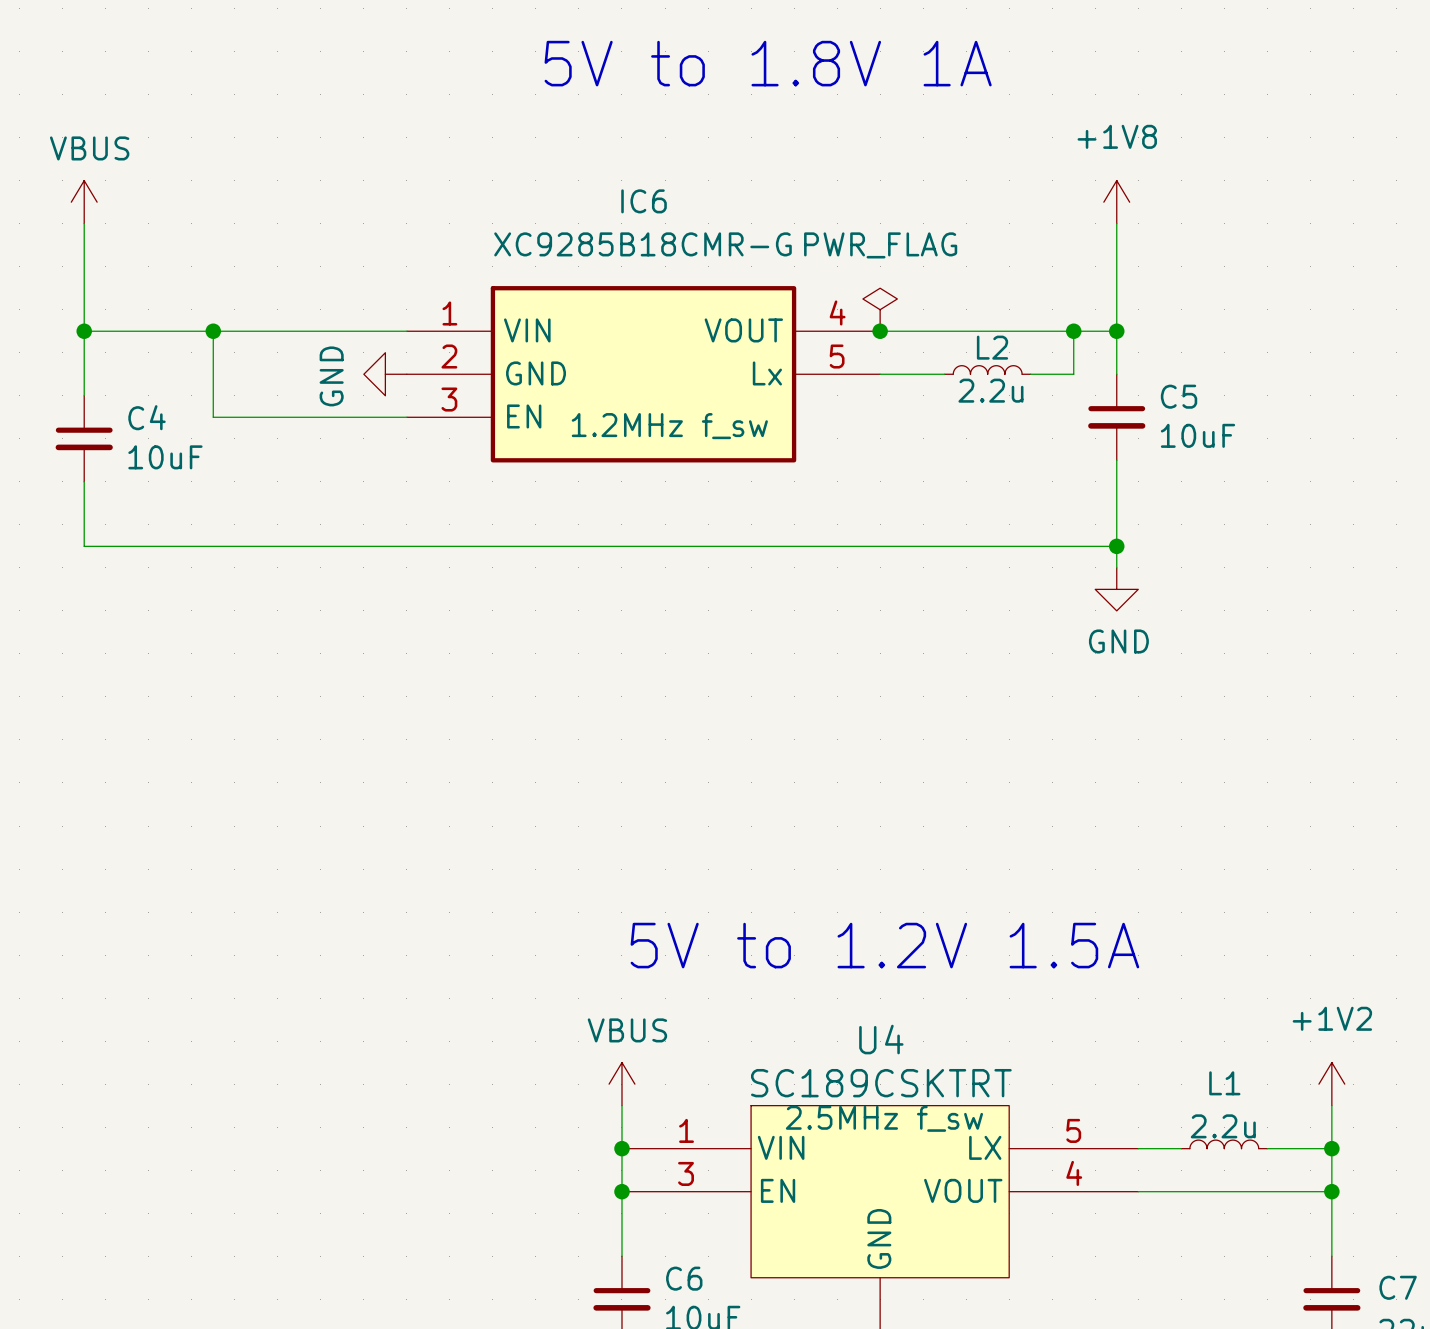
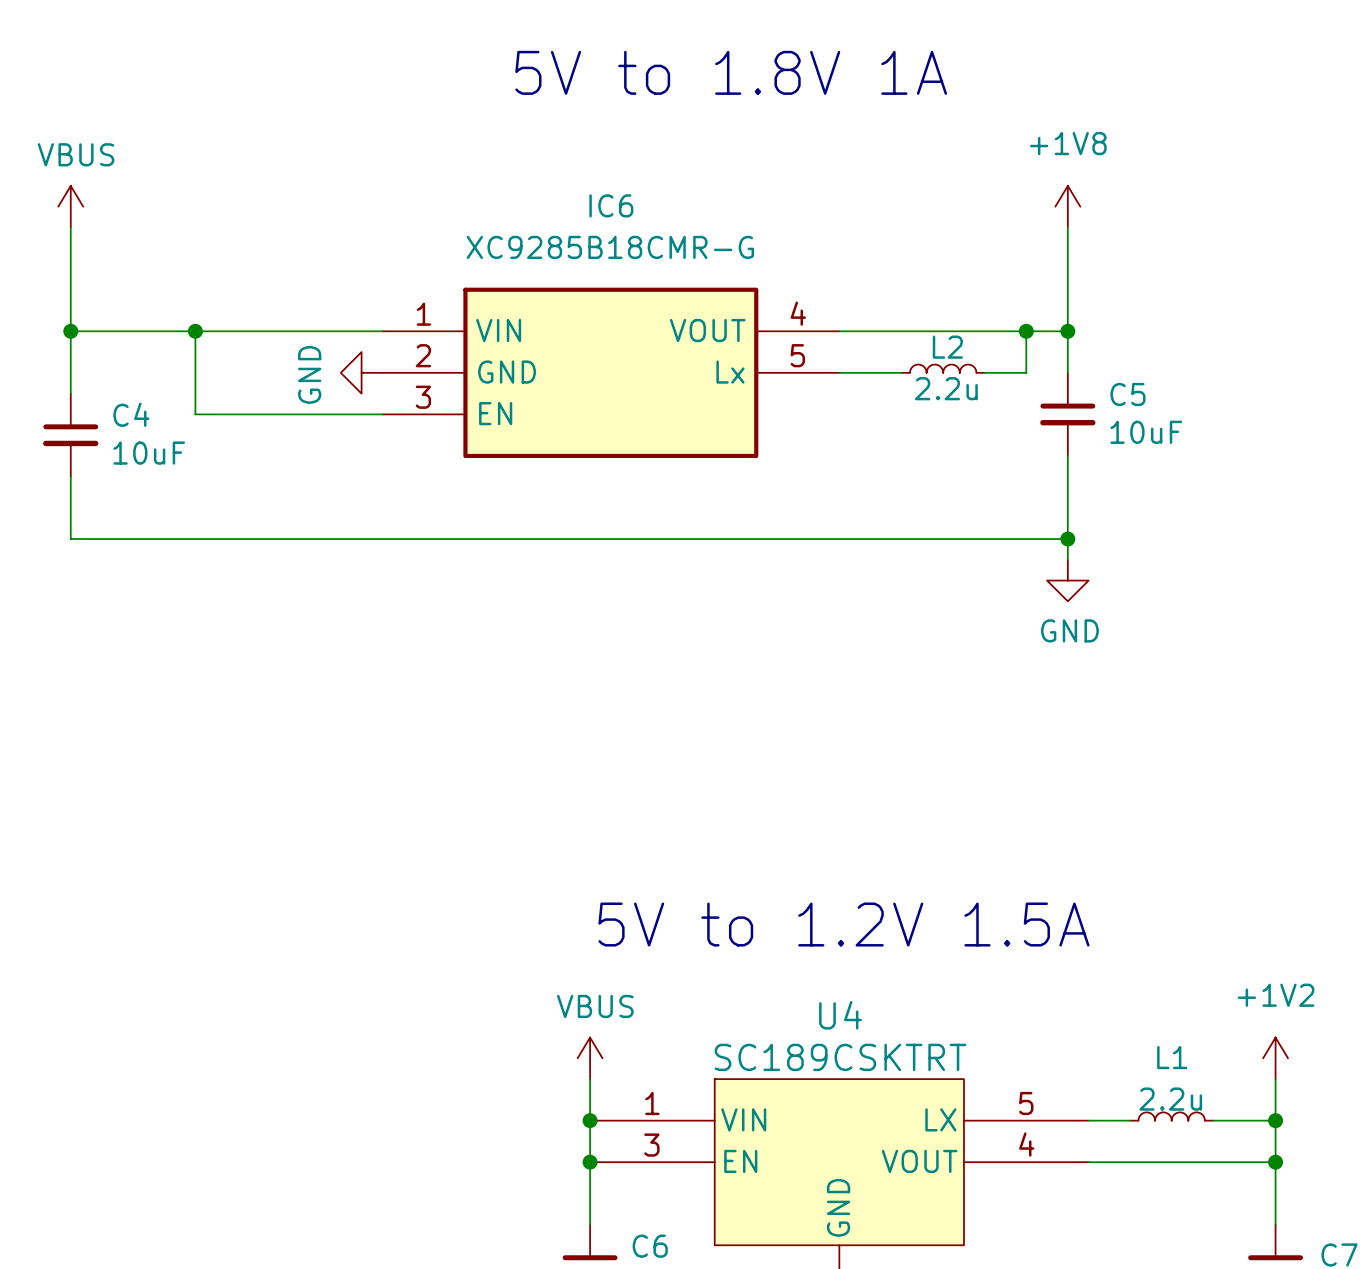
power symbol: PWR_FLAG (880, 309) -> none
junction: (880, 331) -> none
IC6 text: 1.2MHz f_sw (669, 426) -> none
U4 text: 2.5MHz f_sw (884, 1118) -> none

